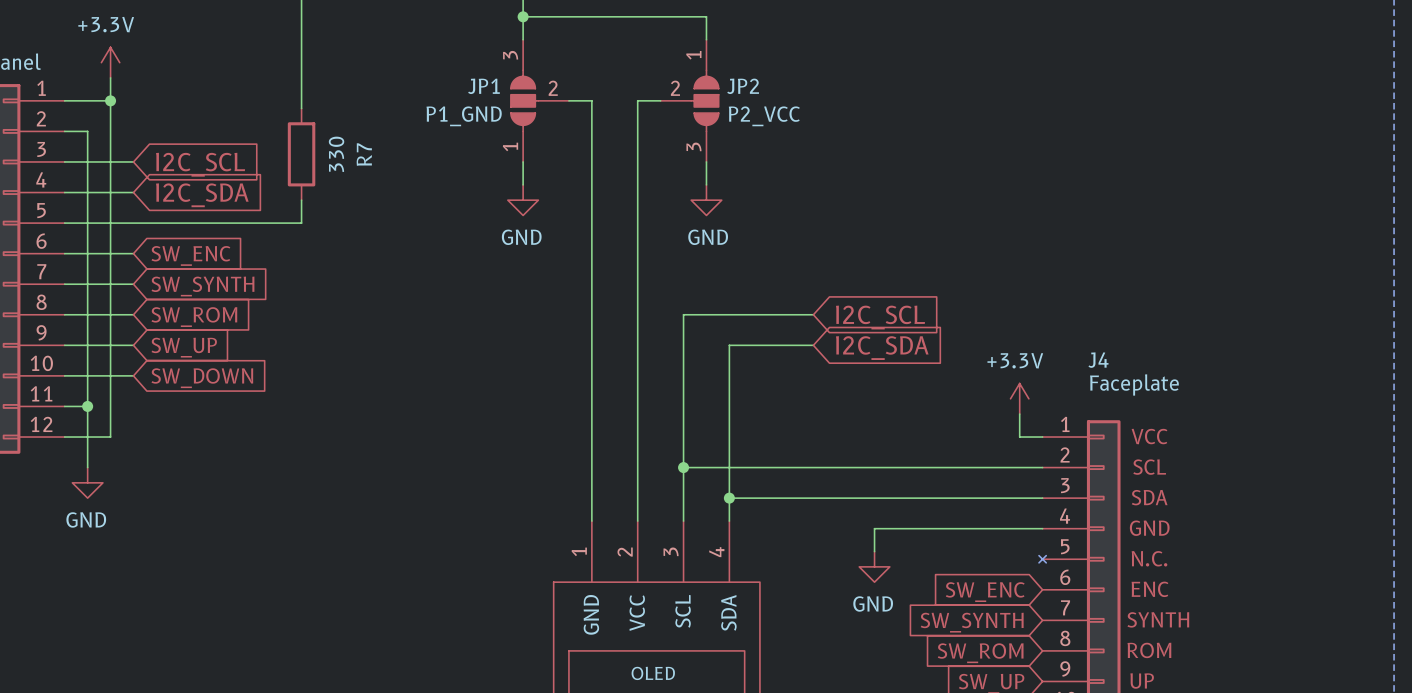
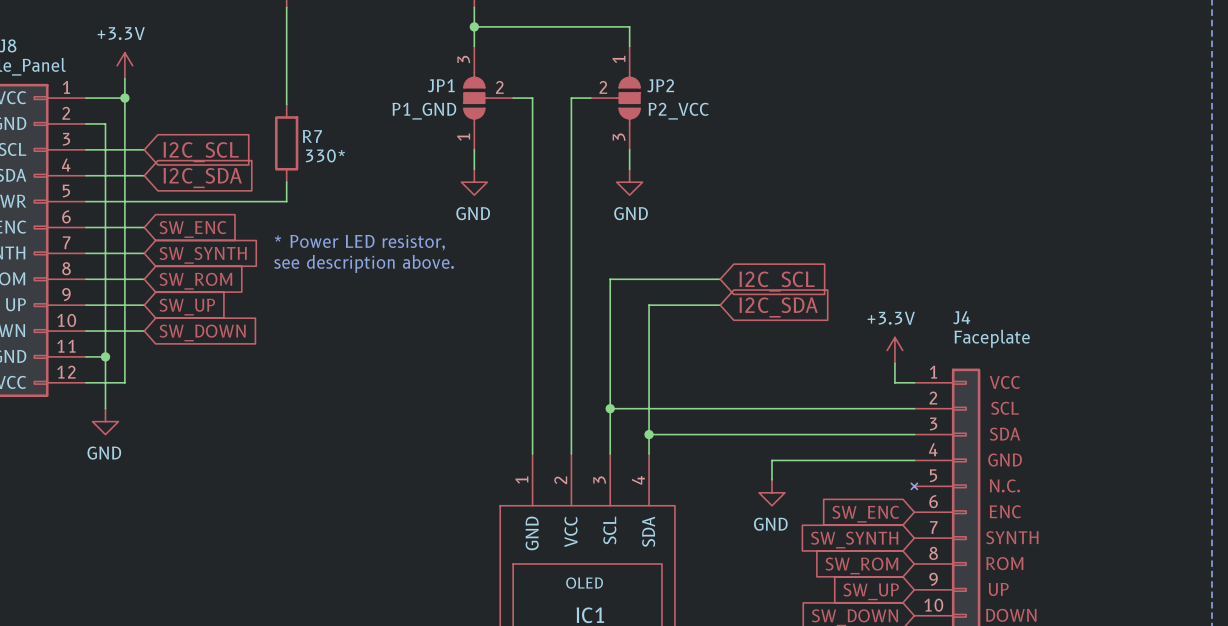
R7 value: 330 (336, 154) -> 330* (325, 155)
R7 name rotation: 0° (364, 154) -> 90° clockwise (312, 136)
text: none -> * Power LED resistor, (359, 242)
text: none -> see description above. (364, 263)

